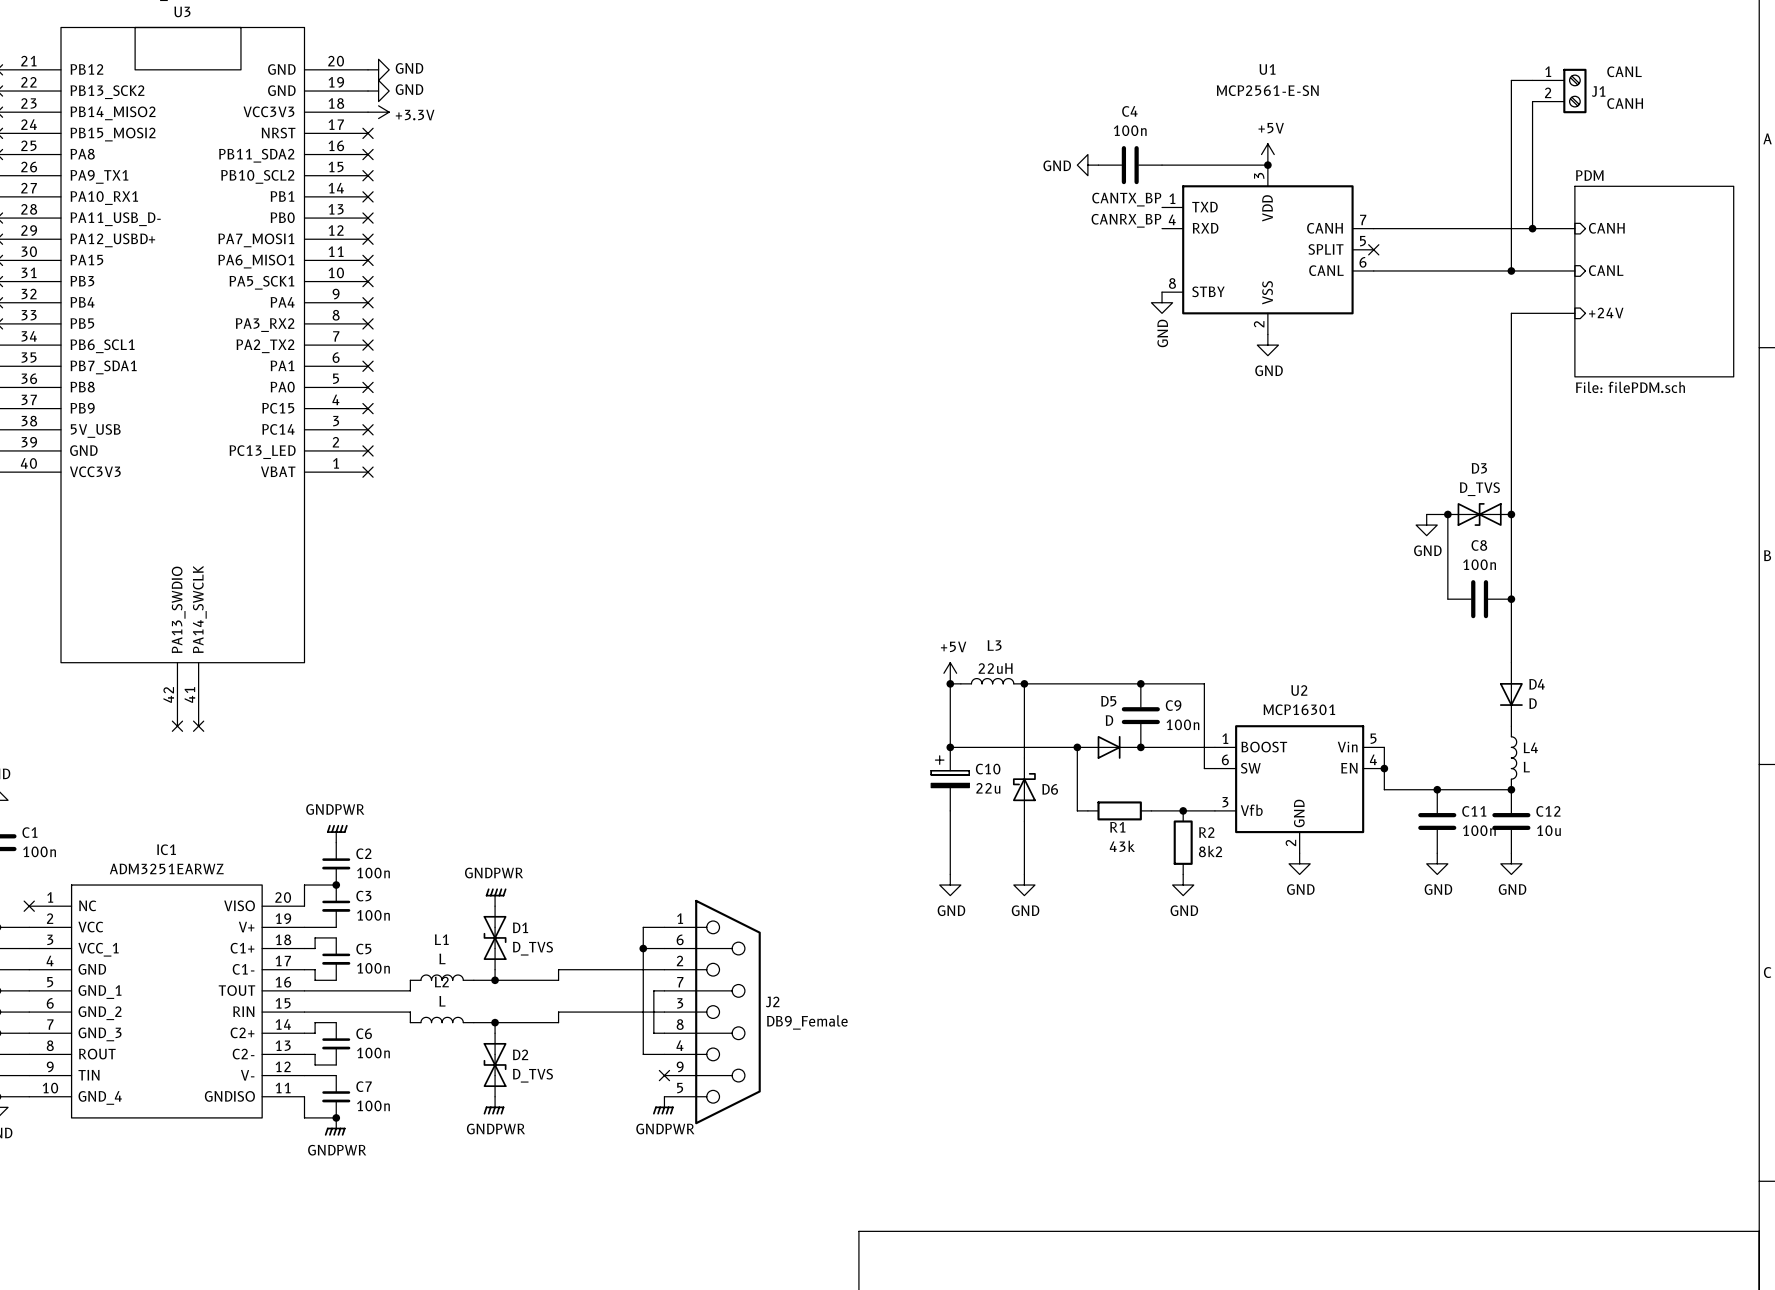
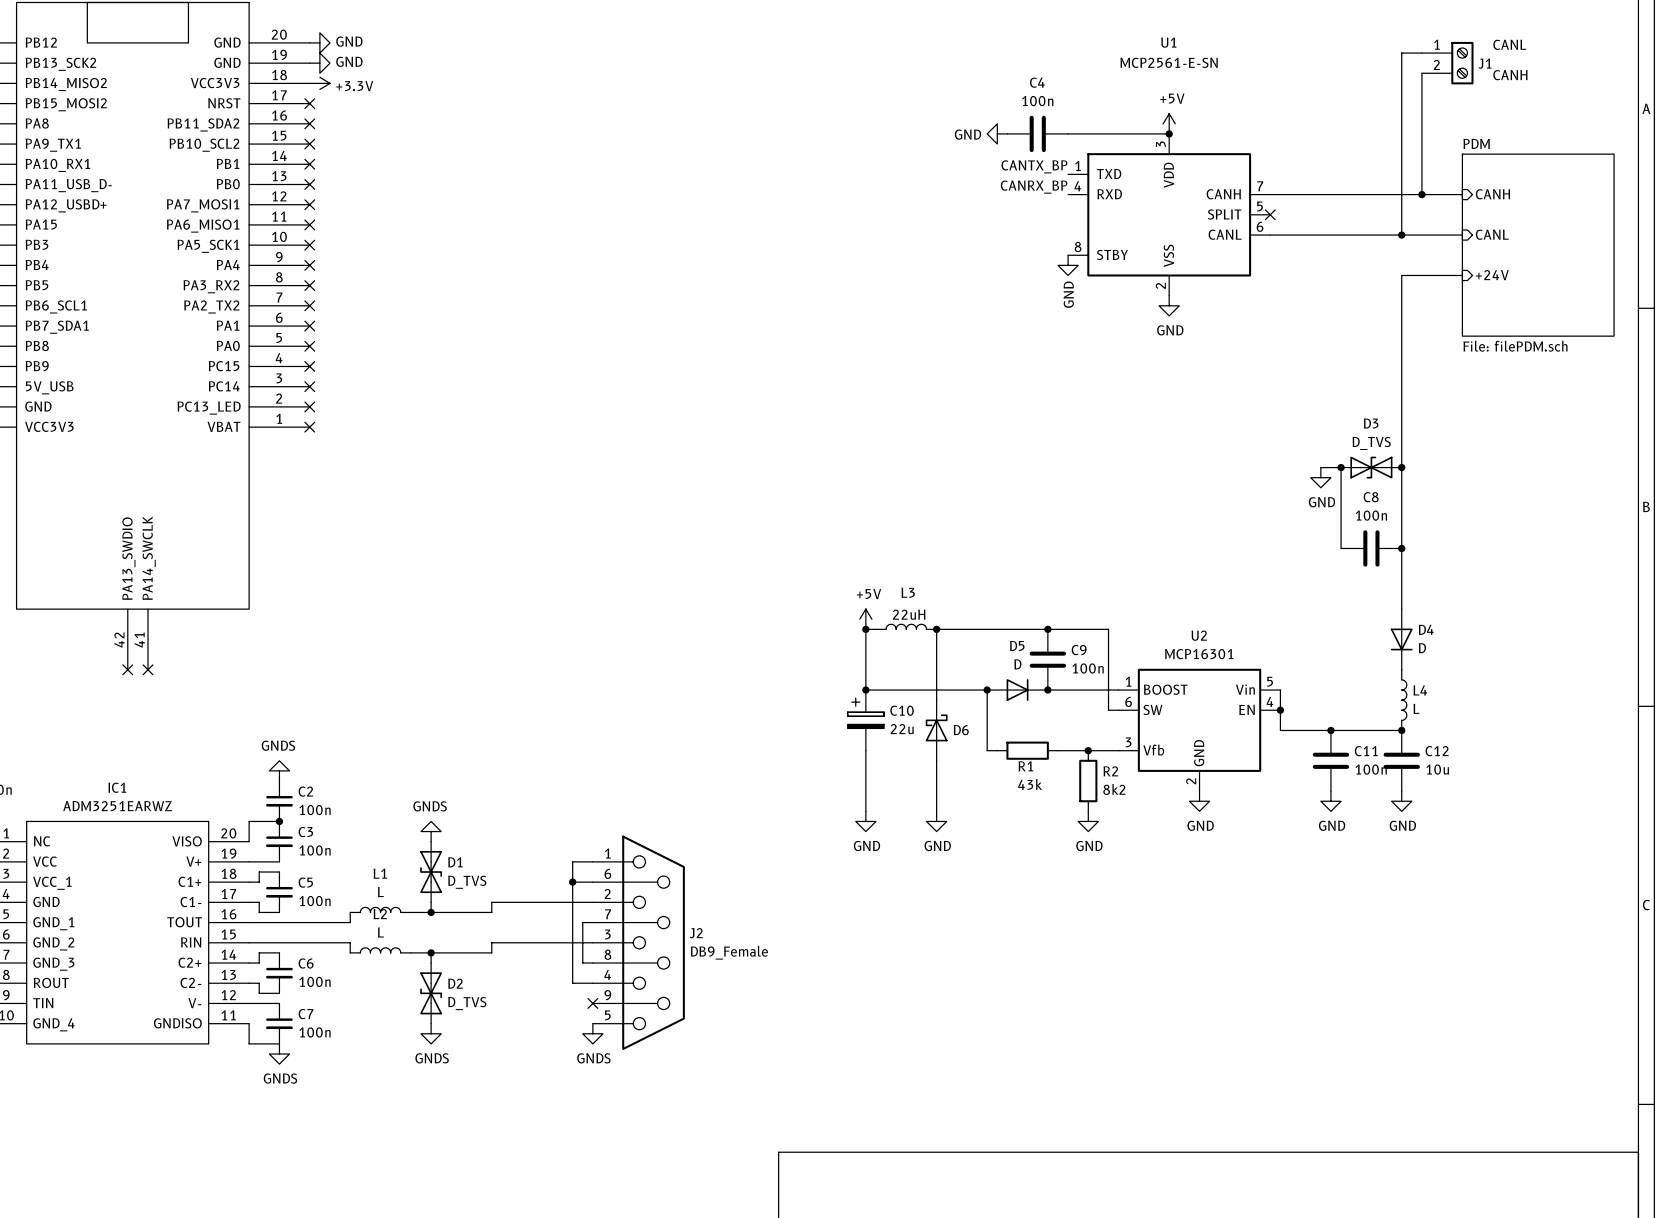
power symbol: GNDPWR (337, 833) -> GNDS (279, 770)
power symbol: GNDPWR (496, 897) -> GNDS (431, 831)
power symbol: GNDPWR (493, 1105) -> GNDS (431, 1033)
power symbol: GNDPWR (663, 1105) -> GNDS (592, 1033)
junction: (336, 1117) -> none
power symbol: GNDPWR (335, 1126) -> GNDS (279, 1054)

